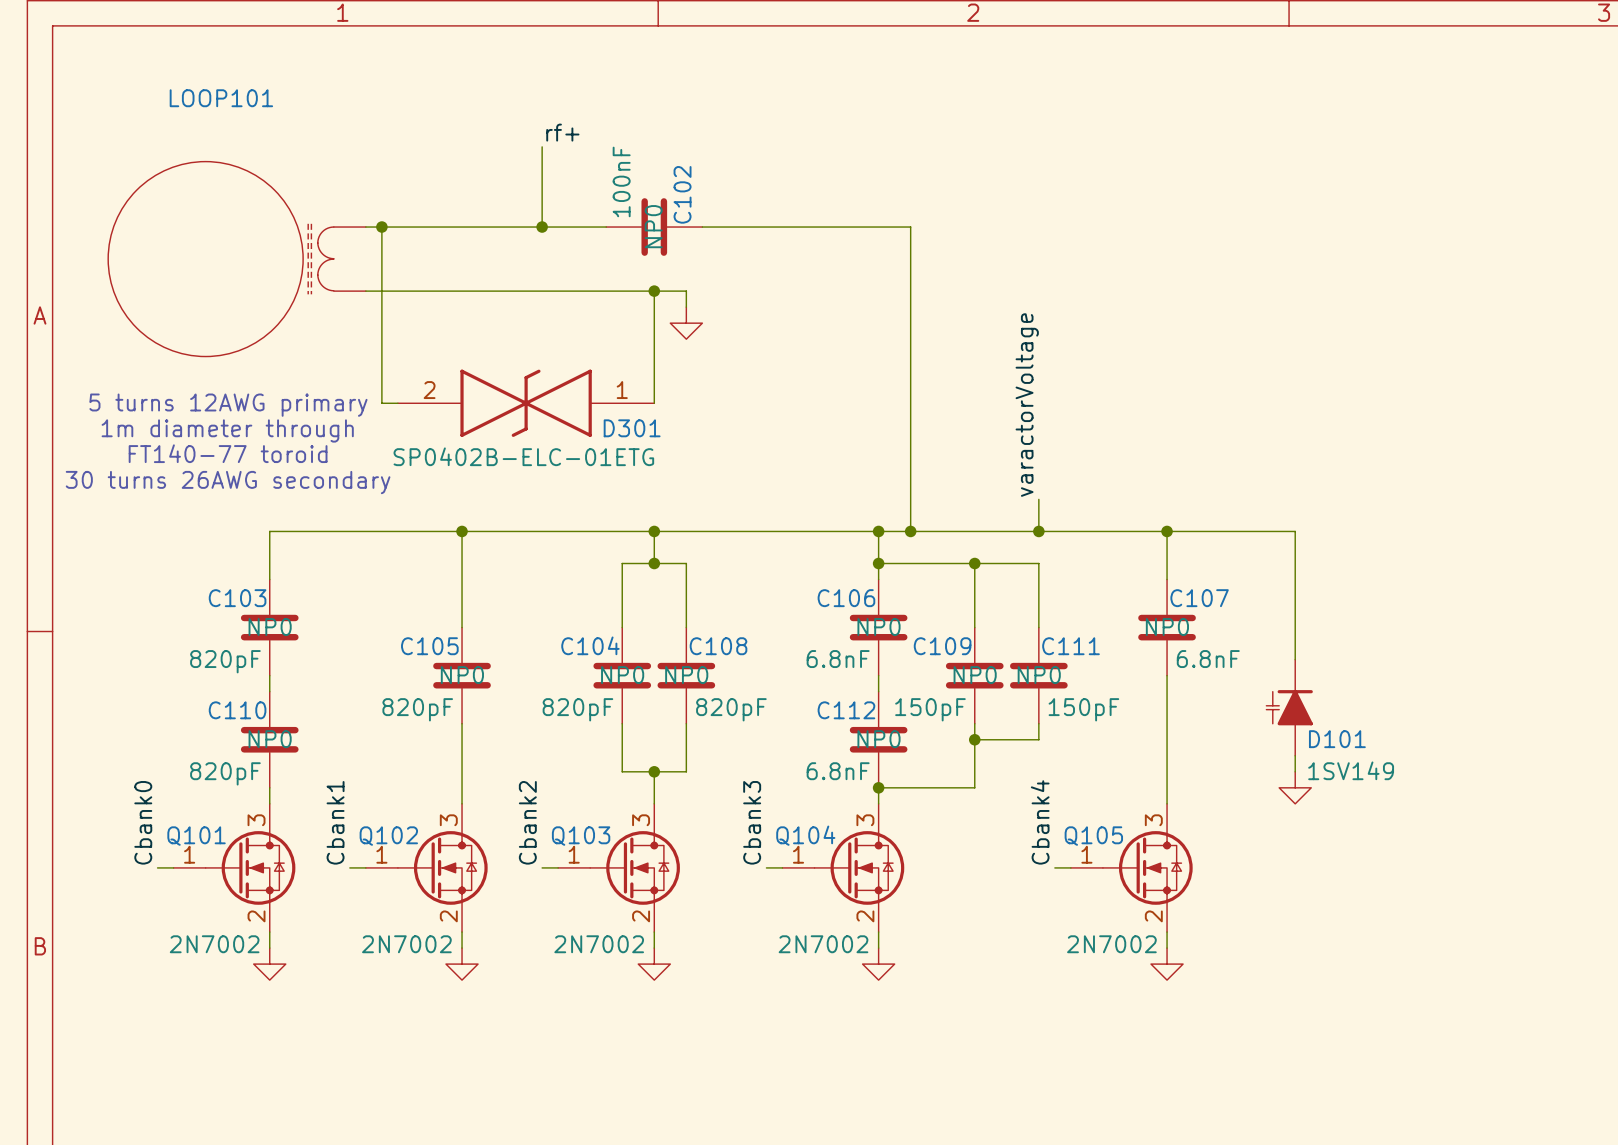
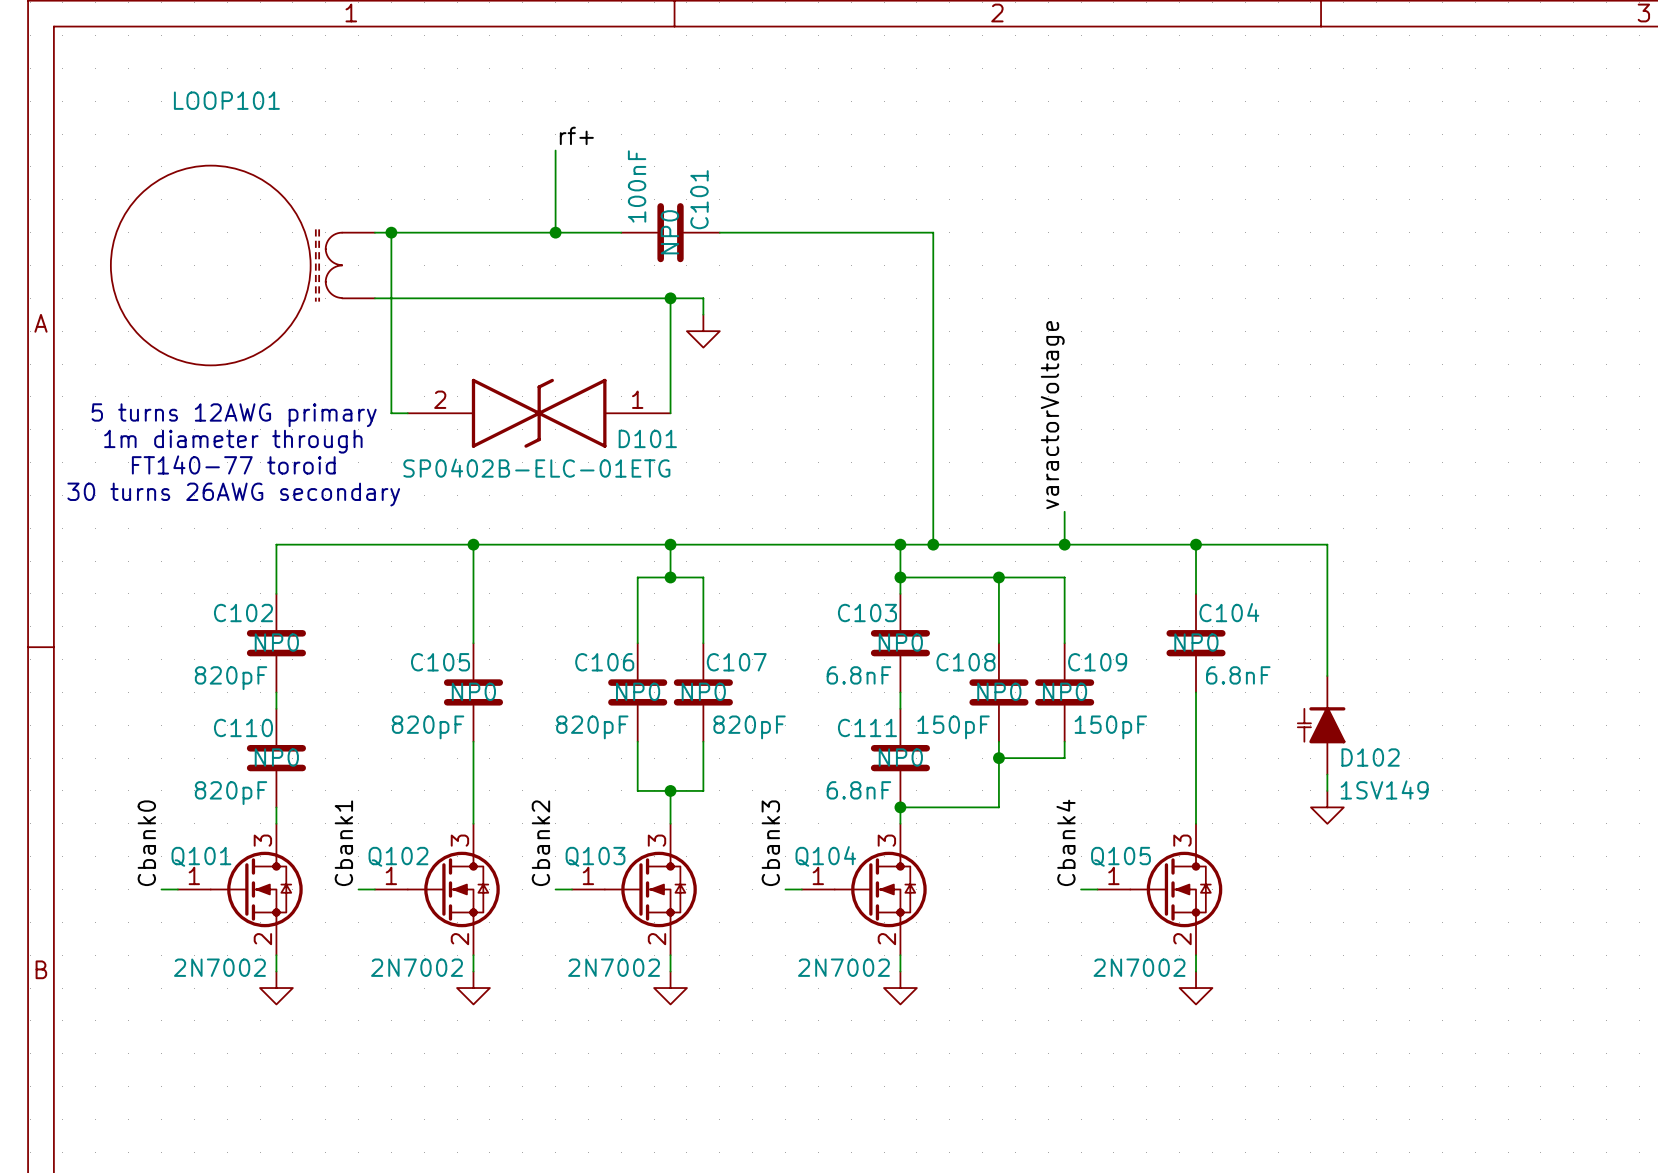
C102 name: C102 (682, 194) -> C101 (699, 199)
D301 name: D301 (632, 428) -> D101 (647, 438)
C103 name: C103 (237, 598) -> C102 (243, 613)
C106 name: C106 (846, 598) -> C103 (867, 613)
C107 name: C107 (1199, 598) -> C104 (1229, 612)
C104 name: C104 (590, 645) -> C106 (604, 662)
C108 name: C108 (718, 646) -> C107 (736, 662)
C109 name: C109 (942, 646) -> C108 (965, 662)
C111 name: C111 (1071, 646) -> C109 (1097, 662)
C112 name: C112 (846, 710) -> C111 (867, 727)
D101 name: D101 (1337, 739) -> D102 (1370, 757)

